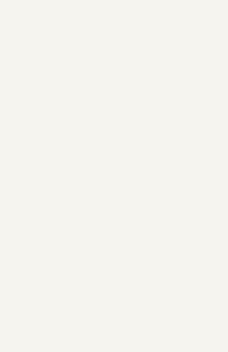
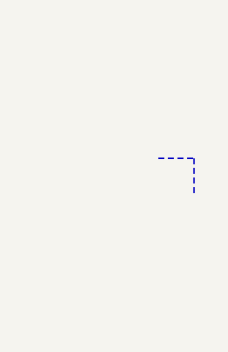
line: none -> (158, 158) (194, 158) (194, 194)

